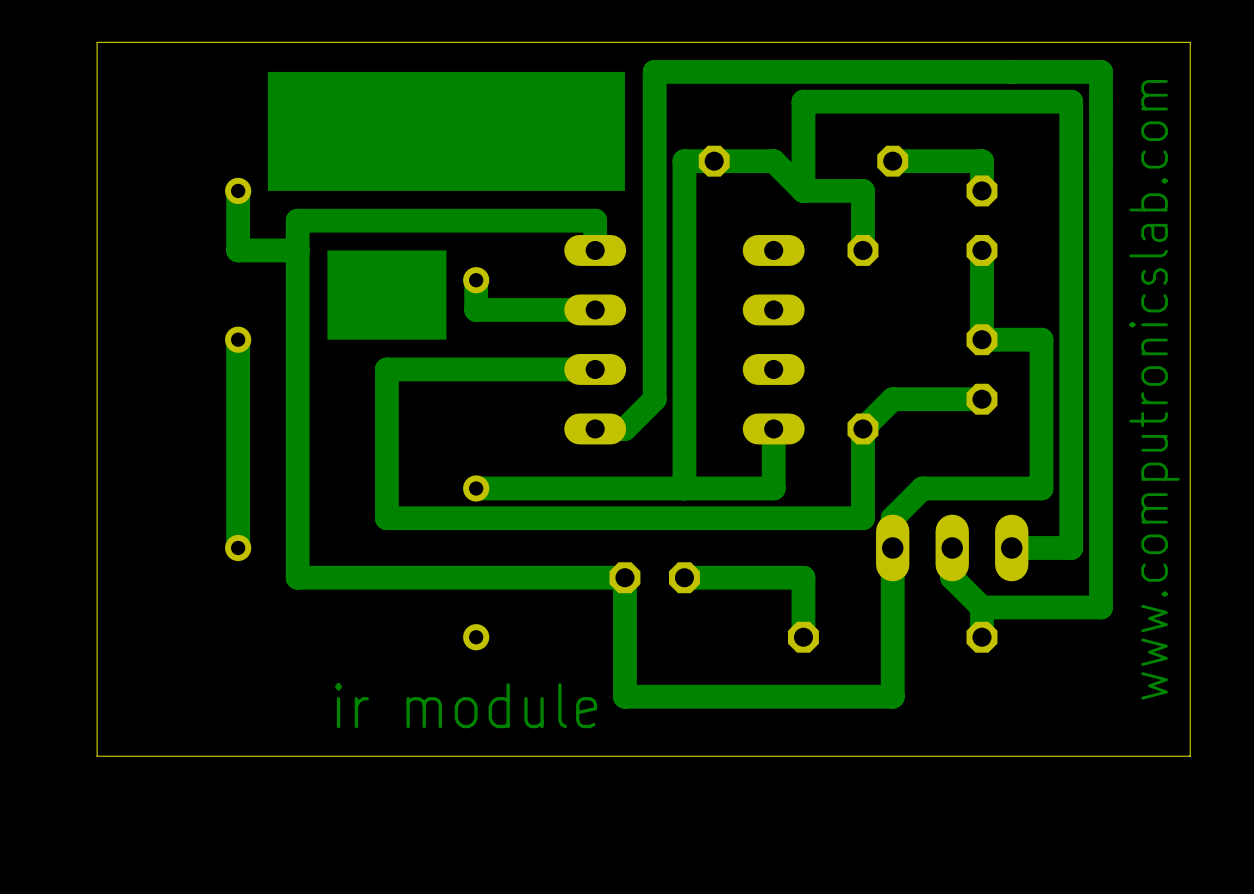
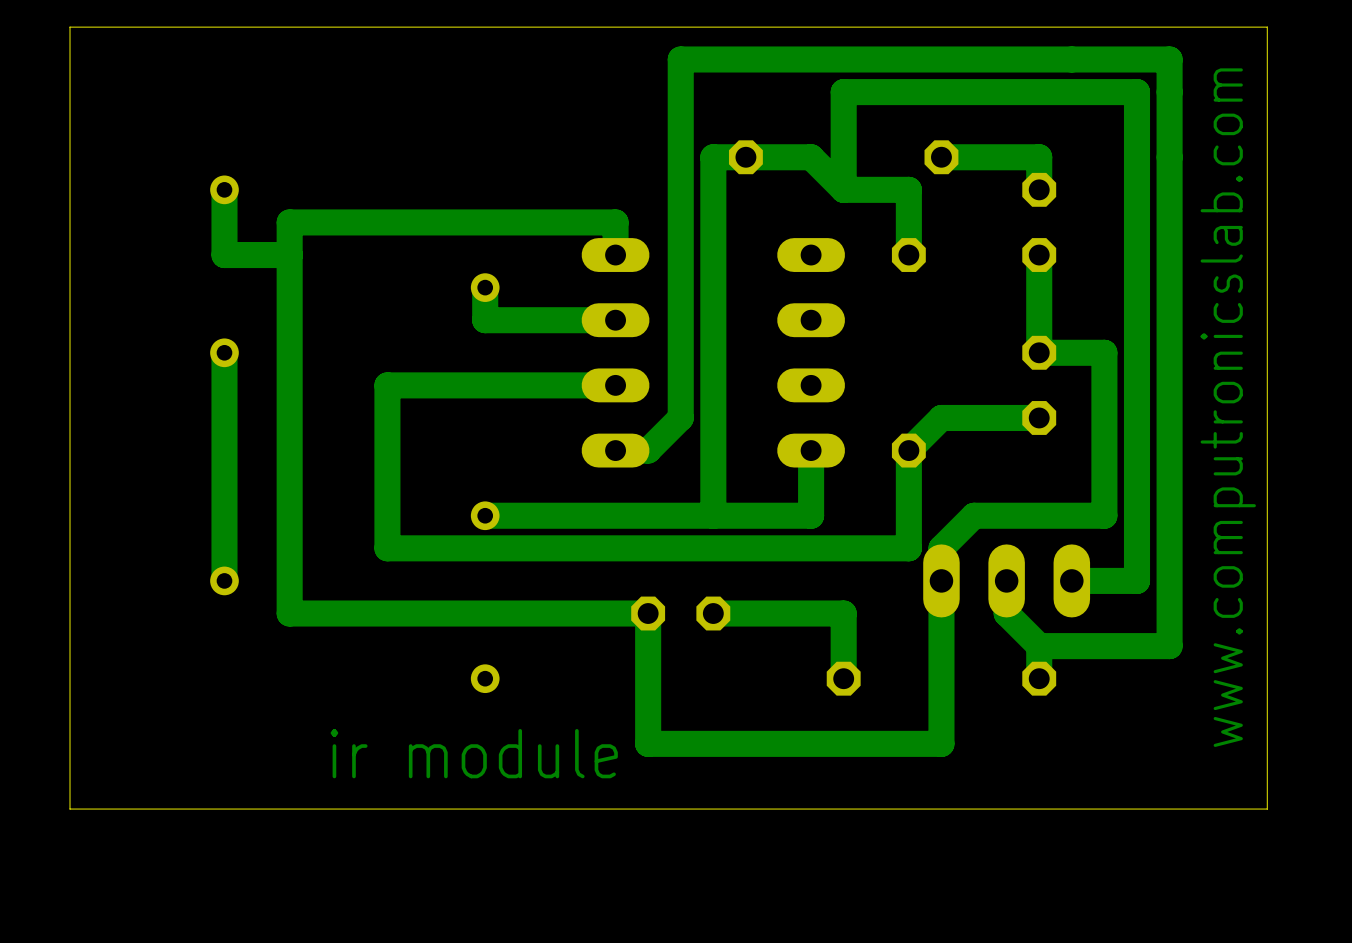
drawing: [267, 71, 625, 191] -> none
drawing: [327, 250, 447, 340] -> none

